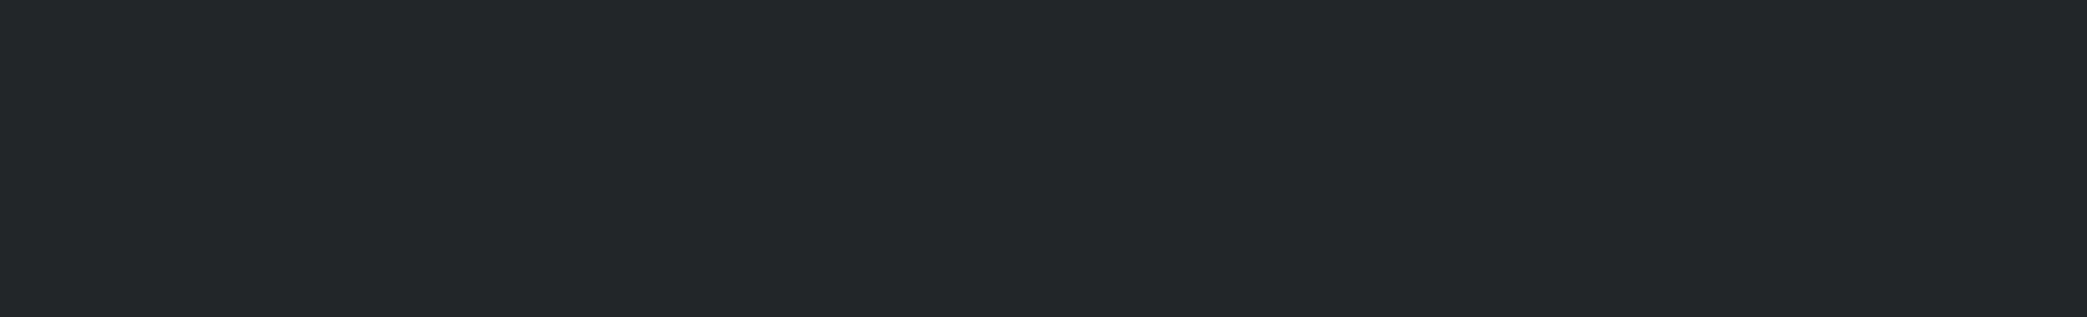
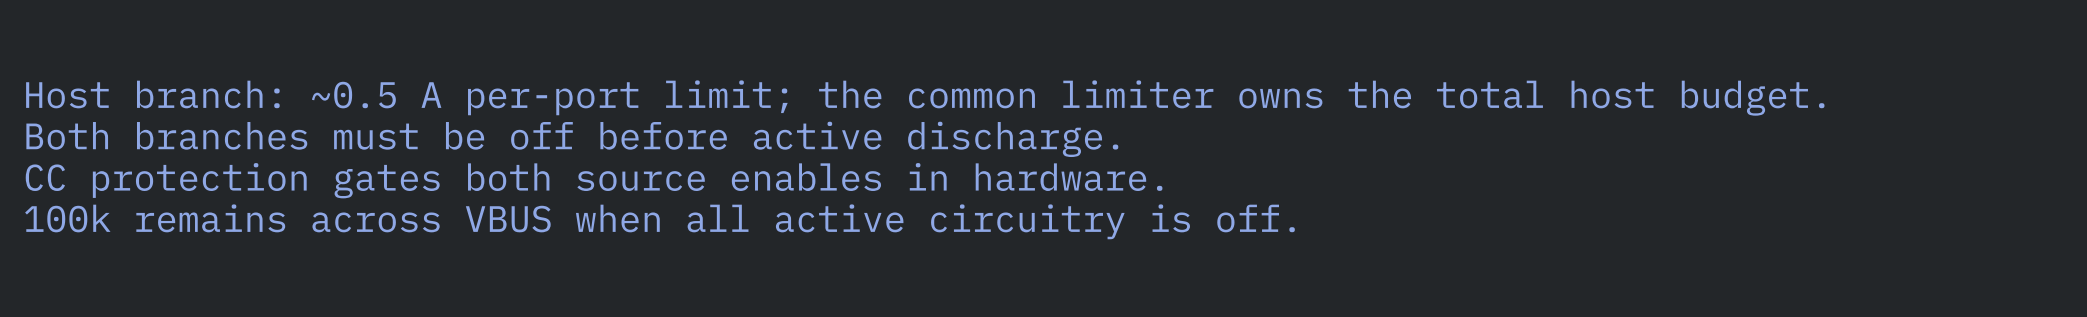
text: none -> Host branch: ~0.5 A per-port limit; the common limiter owns the total host budget. (925, 98)
text: none -> Both branches must be off before active discharge. (572, 139)
text: none -> CC protection gates both source enables in hardware. (594, 180)
text: none -> 100k remains across VBUS when all active circuitry is off. (659, 221)

